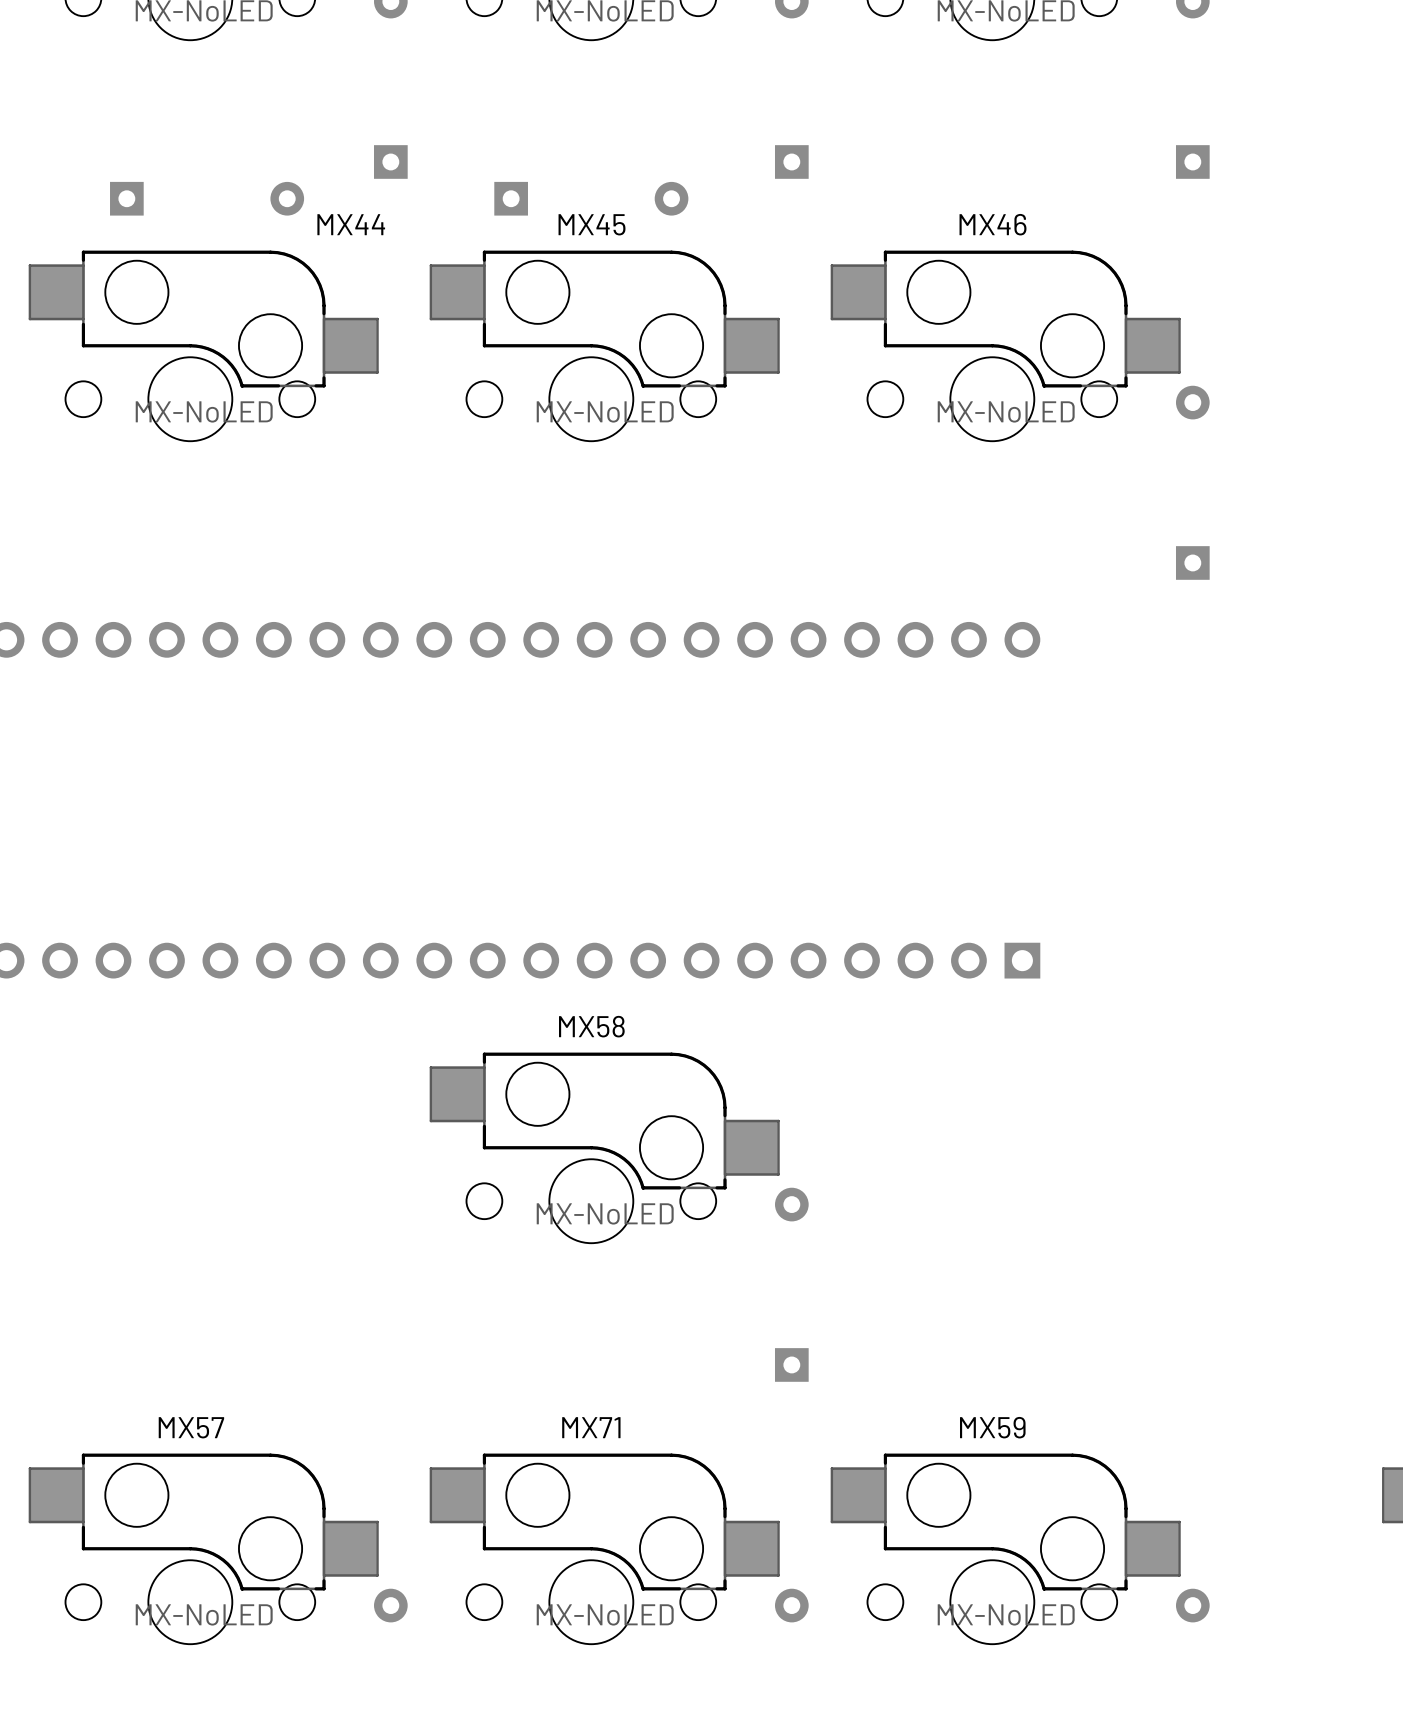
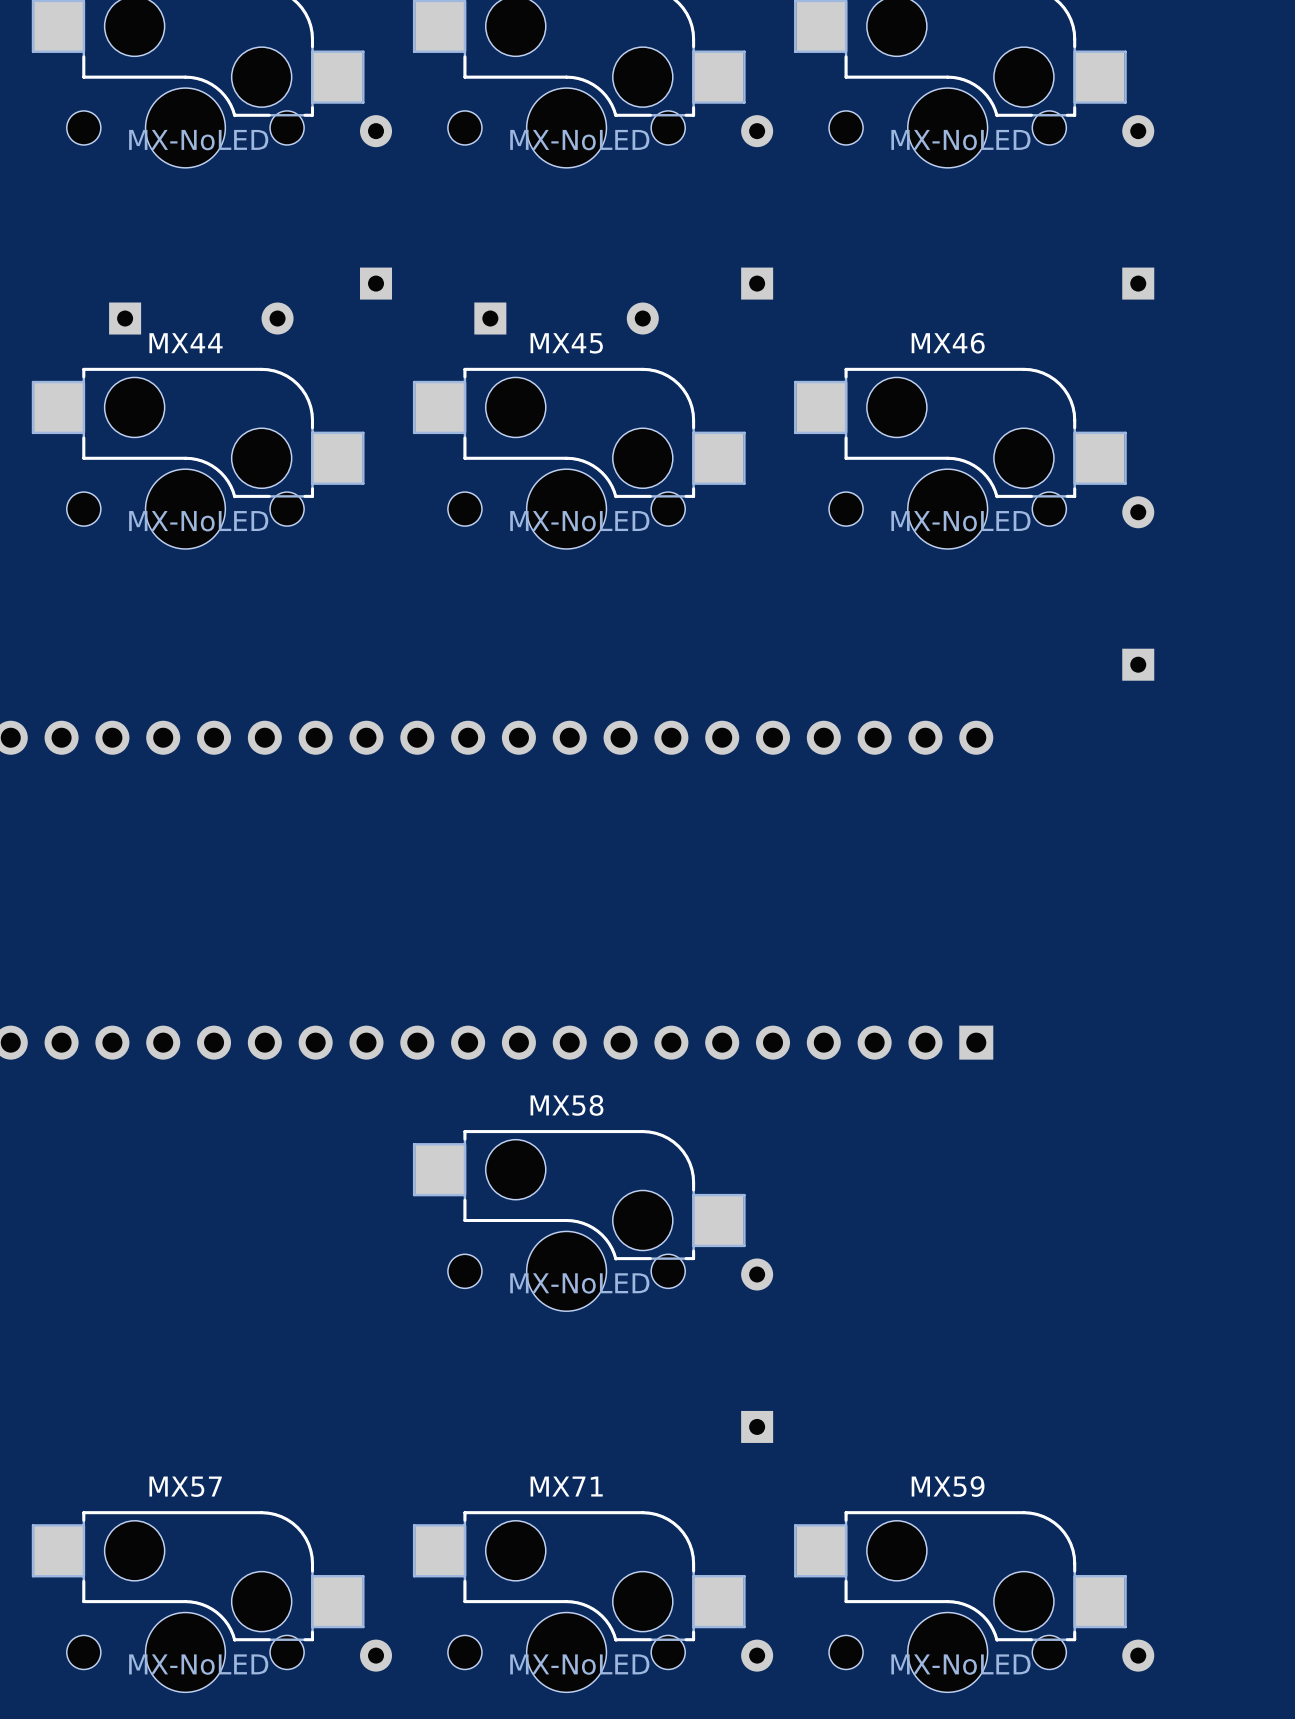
MX44 name position: MX44 (351, 224) -> MX44 (186, 343)

